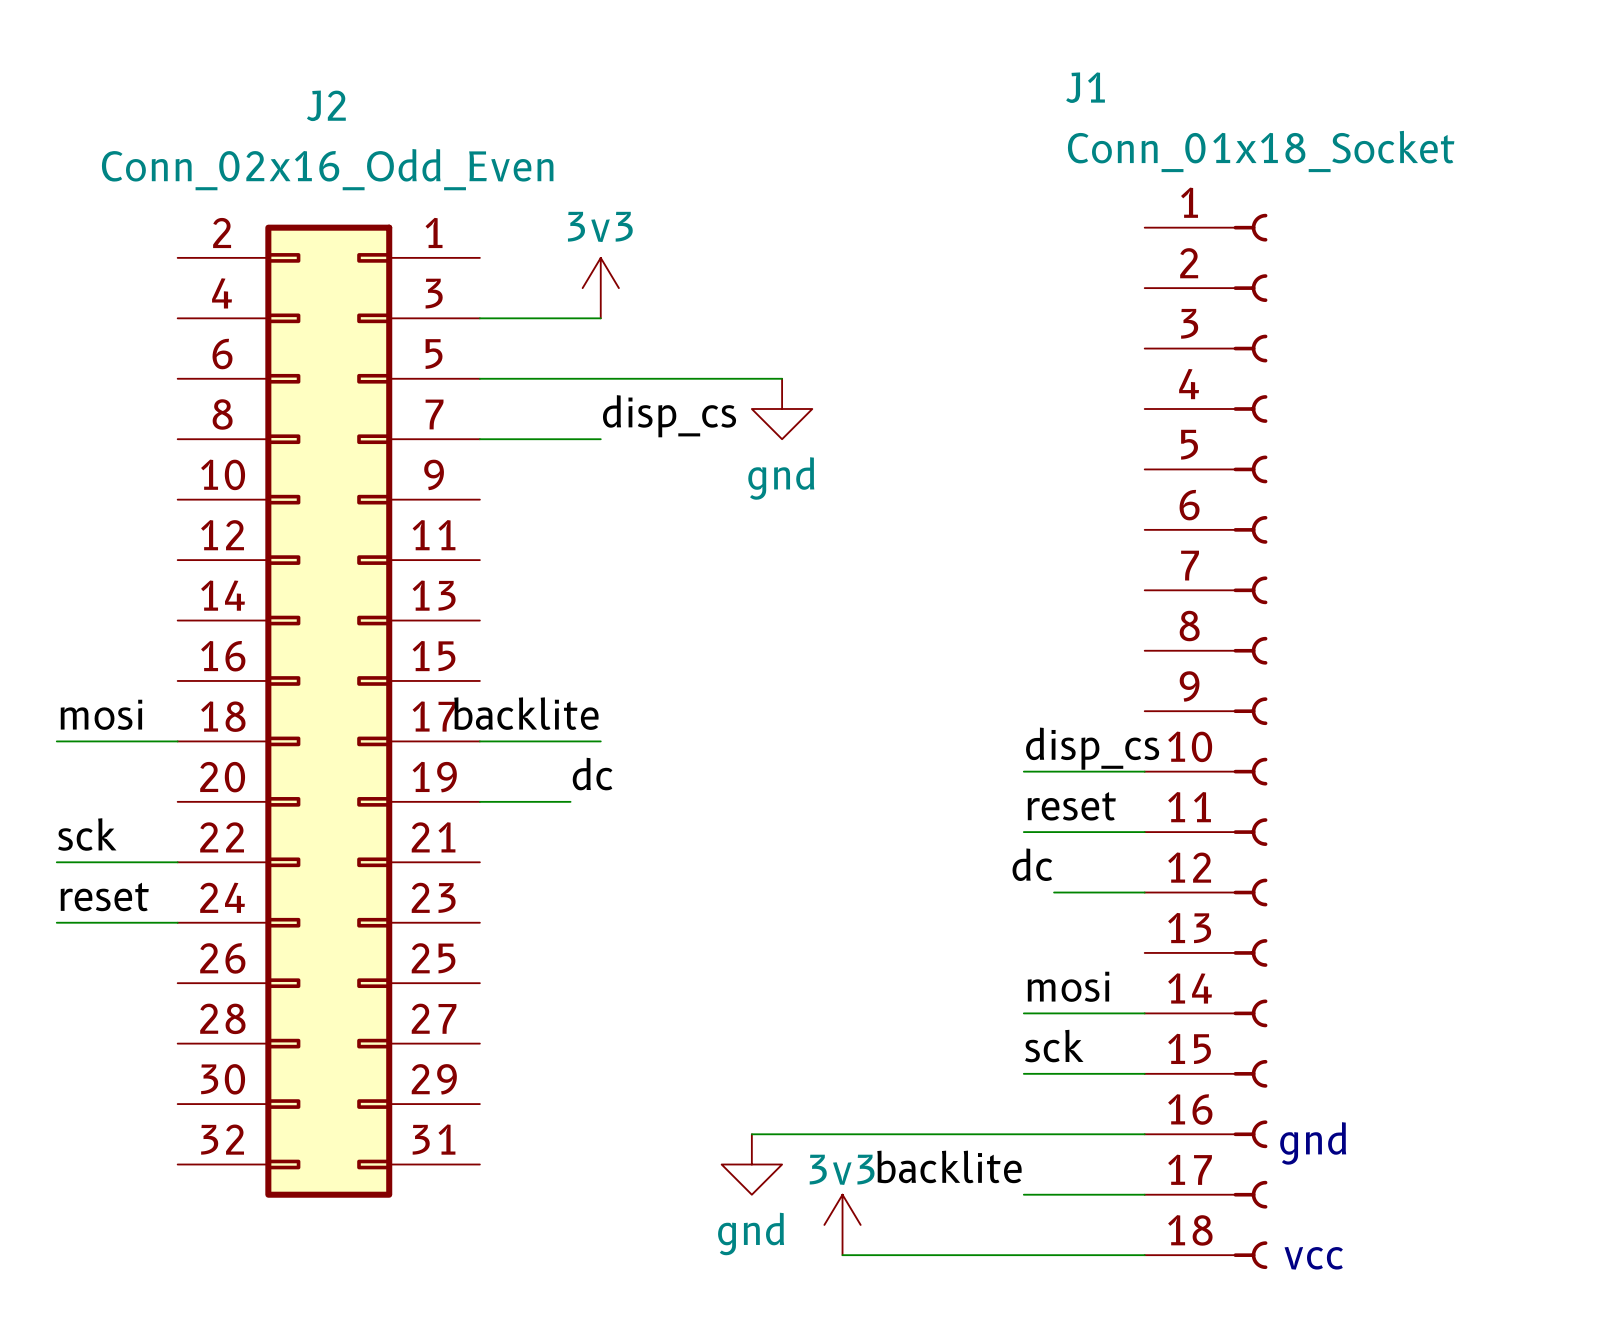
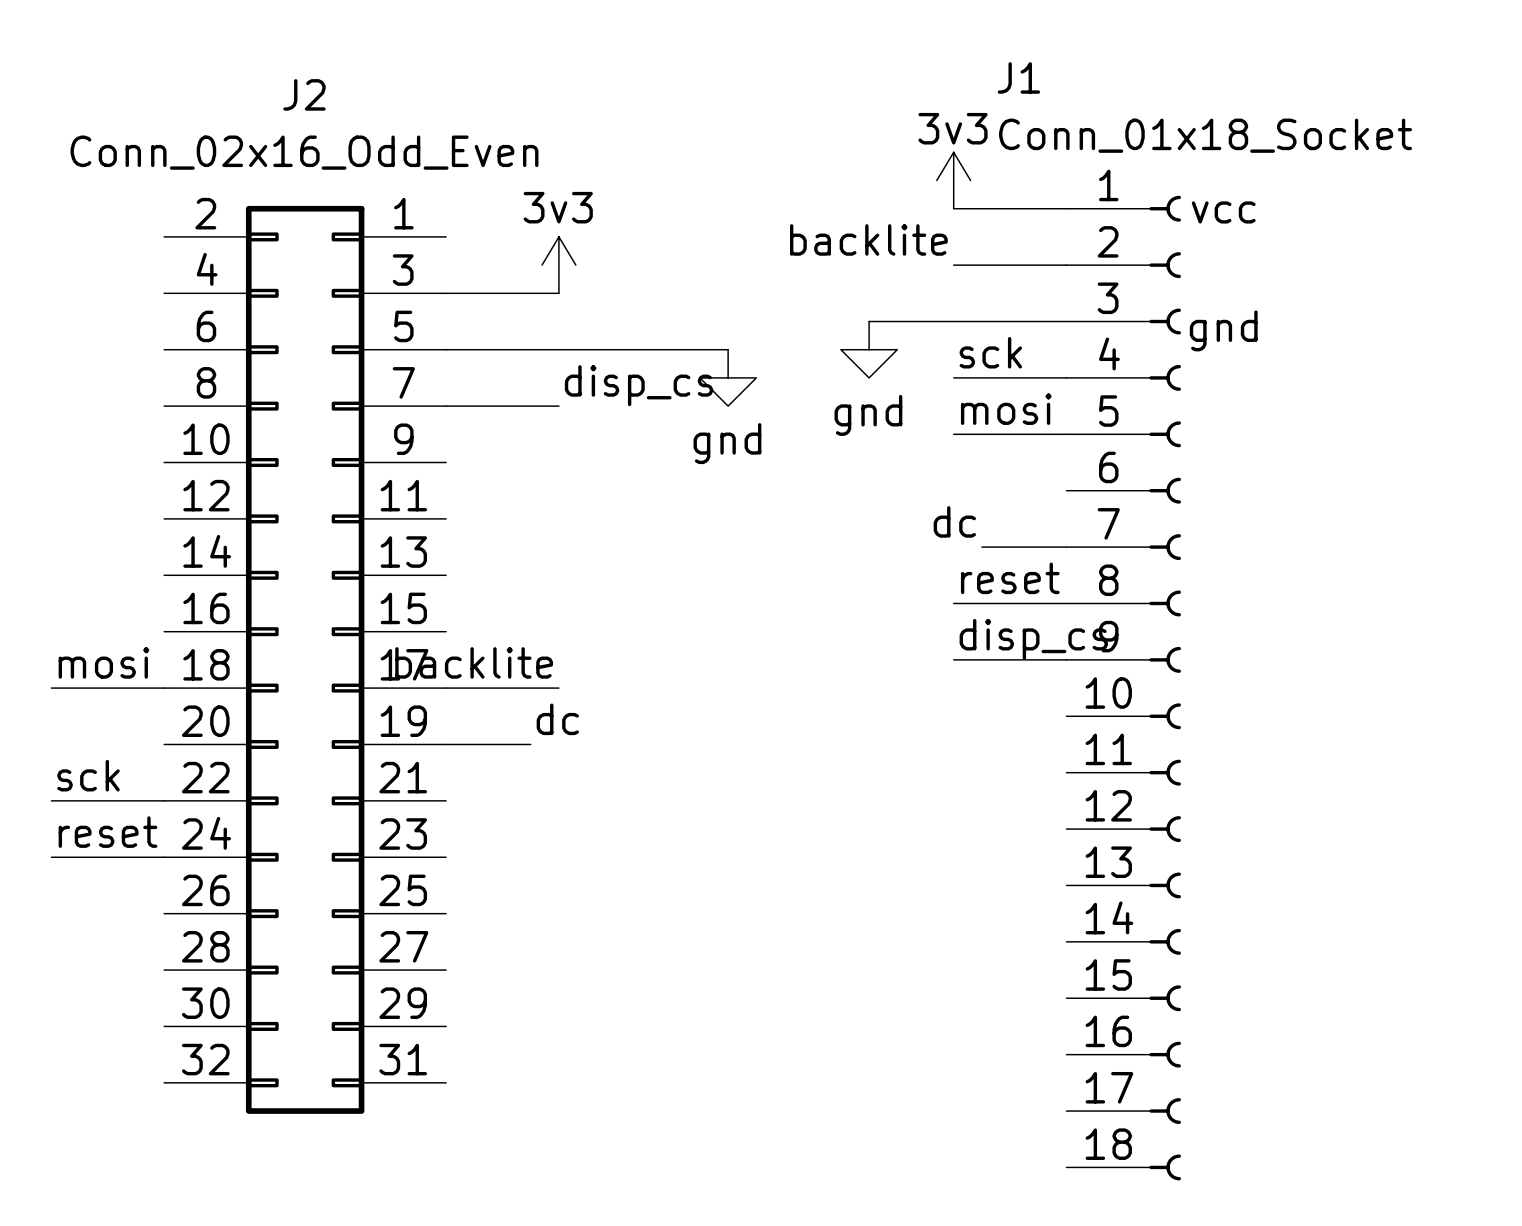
power symbol: none -> 3v3 (953, 180)
wire: none -> (953, 208) (1066, 208)
text: none -> vcc (1223, 212)
label: none -> backlite (868, 239)
wire: none -> (953, 265) (1066, 265)
wire: none -> (869, 321) (1066, 321)
text: none -> gnd (1223, 330)
power symbol: none -> gnd (869, 349)
label: none -> sck (990, 352)
label position: disp_cs (1092, 748) -> disp_cs (1033, 639)
wire: (1023, 771) (1144, 771) -> (953, 377) (1066, 377)
label position: reset (1071, 806) -> reset (1010, 578)
wire: (1023, 832) (1144, 832) -> (953, 434) (1066, 434)
label position: dc (1032, 864) -> dc (954, 521)
wire: (1054, 892) (1144, 892) -> (981, 547) (1066, 547)
label position: mosi (1068, 986) -> mosi (1006, 409)
wire: (1023, 1013) (1144, 1013) -> (953, 603) (1066, 603)
label: sck (1054, 1046) -> none
wire: (1023, 1073) (1144, 1073) -> (953, 659) (1066, 659)
wire: (751, 1134) (1144, 1134) -> none
text: gnd (1313, 1143) -> none
power symbol: gnd (751, 1164) -> none
label: backlite (949, 1166) -> none
wire: (1023, 1194) (1144, 1194) -> none
power symbol: 3v3 (842, 1224) -> none
wire: (842, 1255) (1144, 1255) -> none
text: vcc (1313, 1258) -> none

